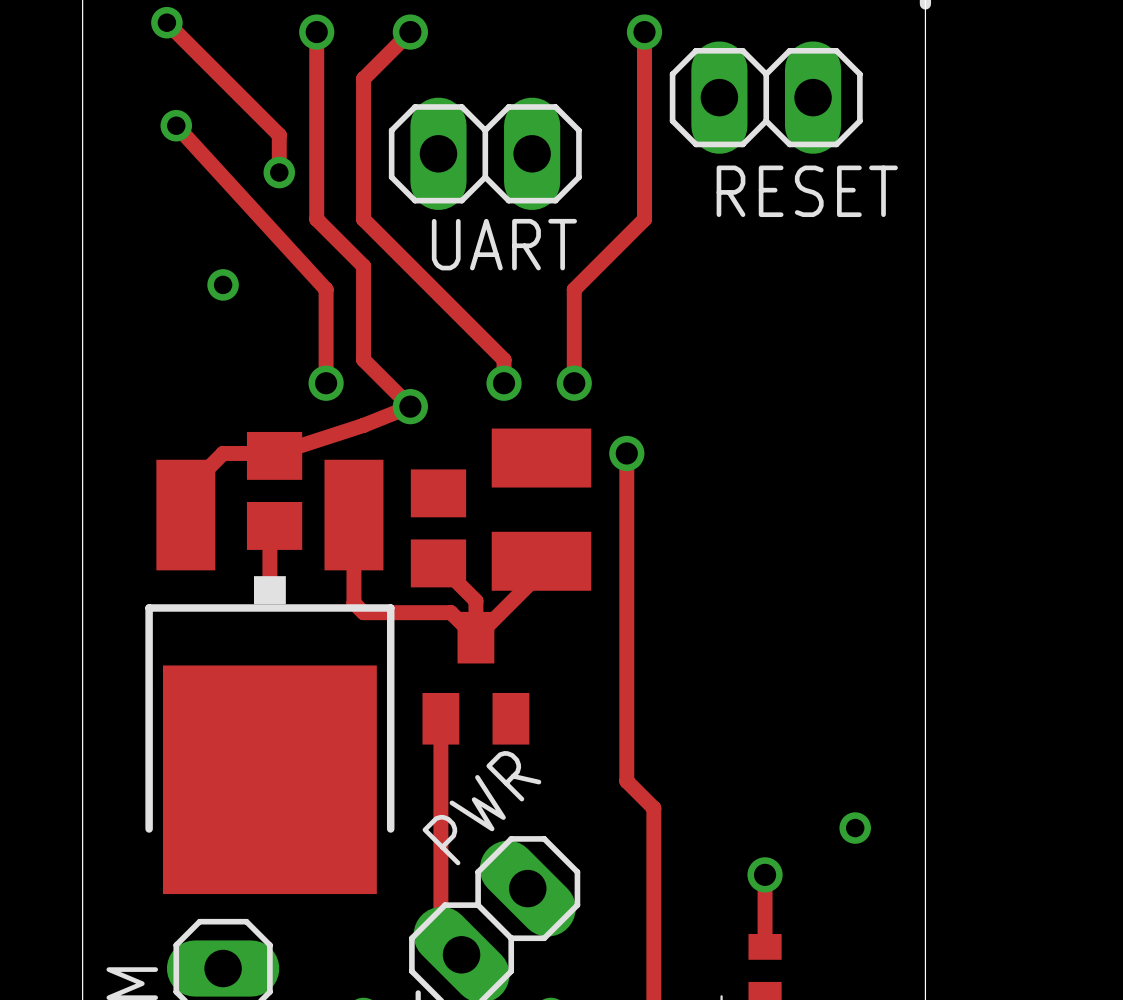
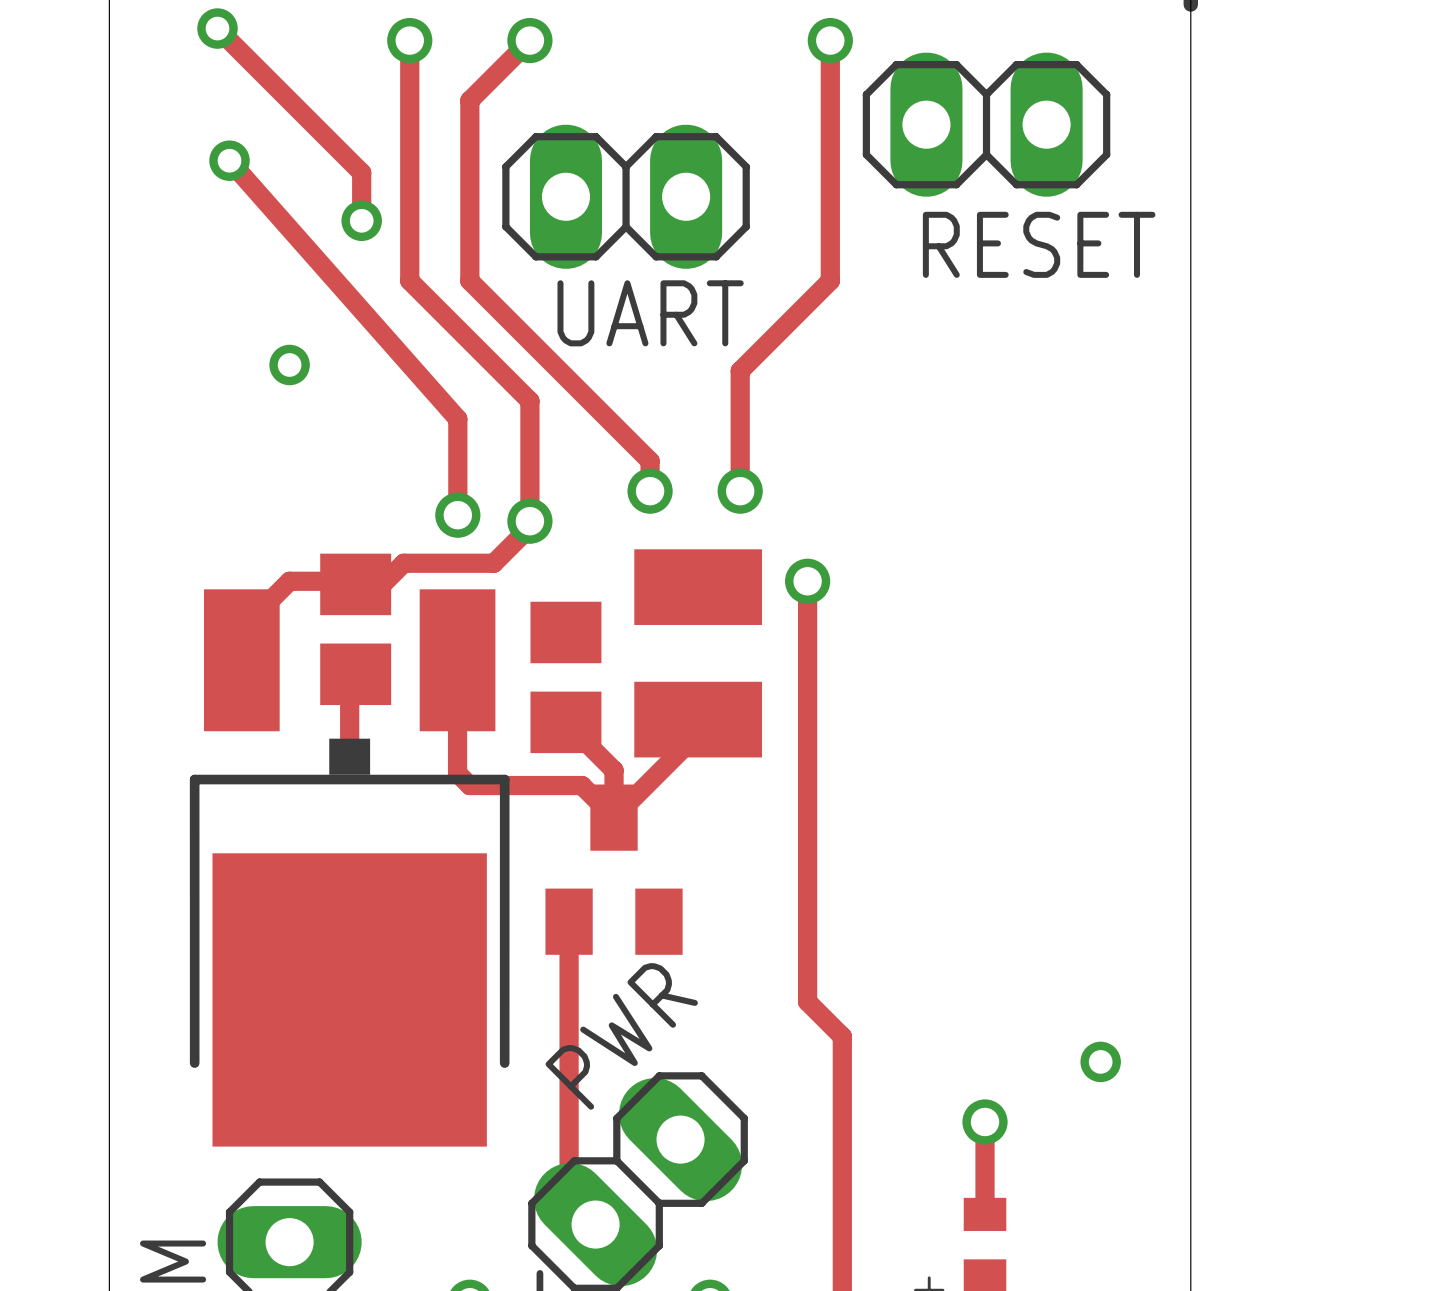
track: (176, 125) (326, 289) (326, 383) -> (229, 160) (457, 419) (457, 515)
track: (363, 266) (363, 359) (410, 406) (363, 425) (277, 453) -> (469, 340) (529, 401) (529, 527) (493, 563) (403, 563) (382, 584) (355, 584)
via position: (326, 383) -> (457, 515)

